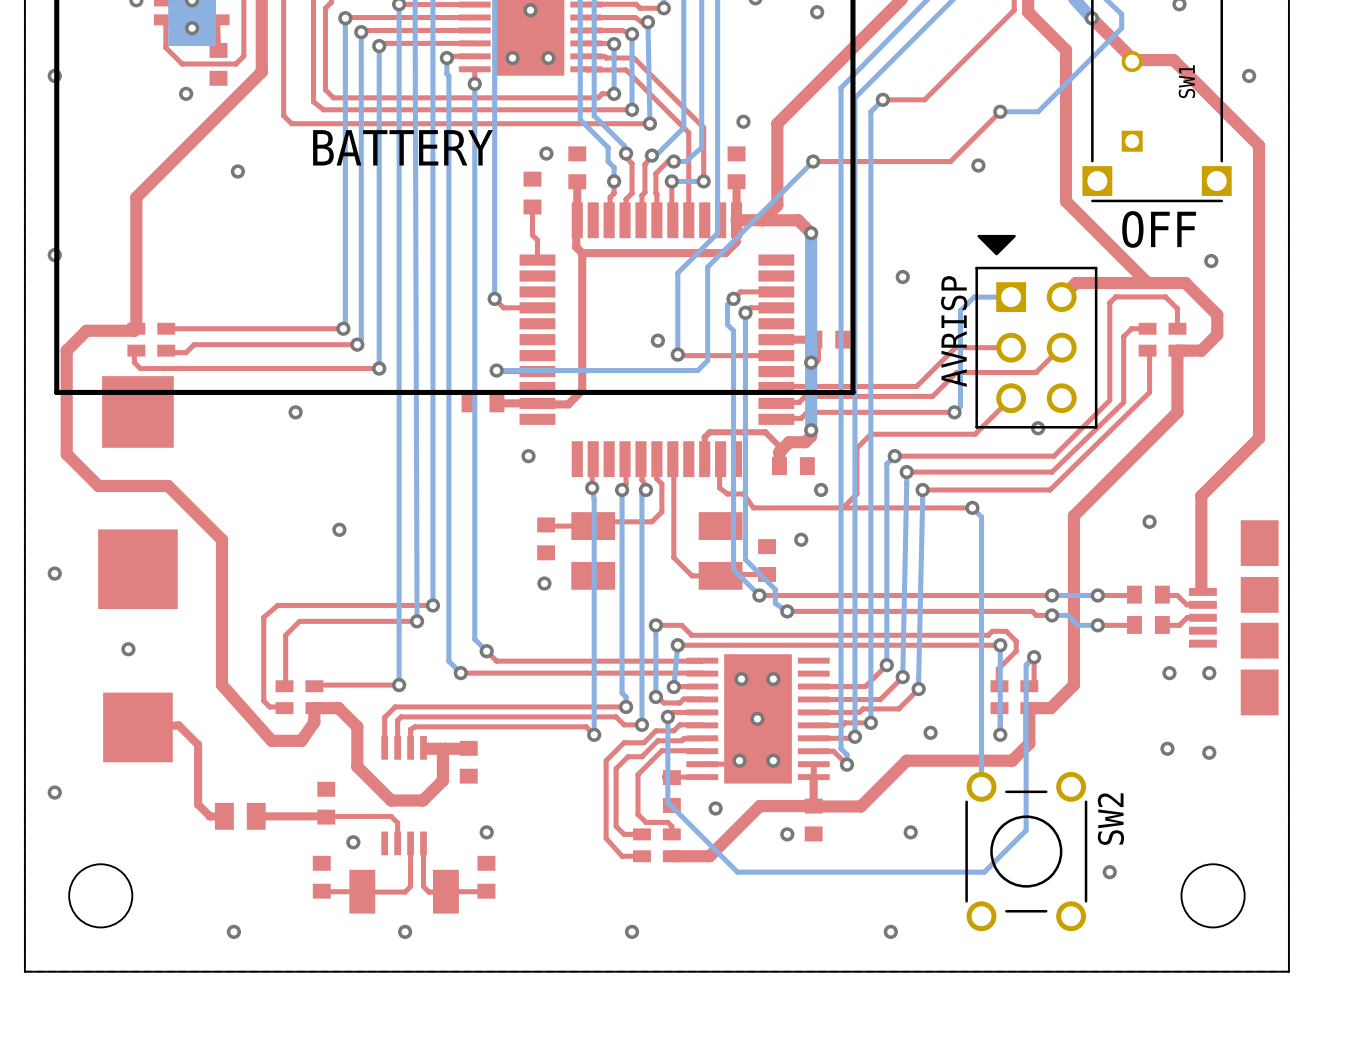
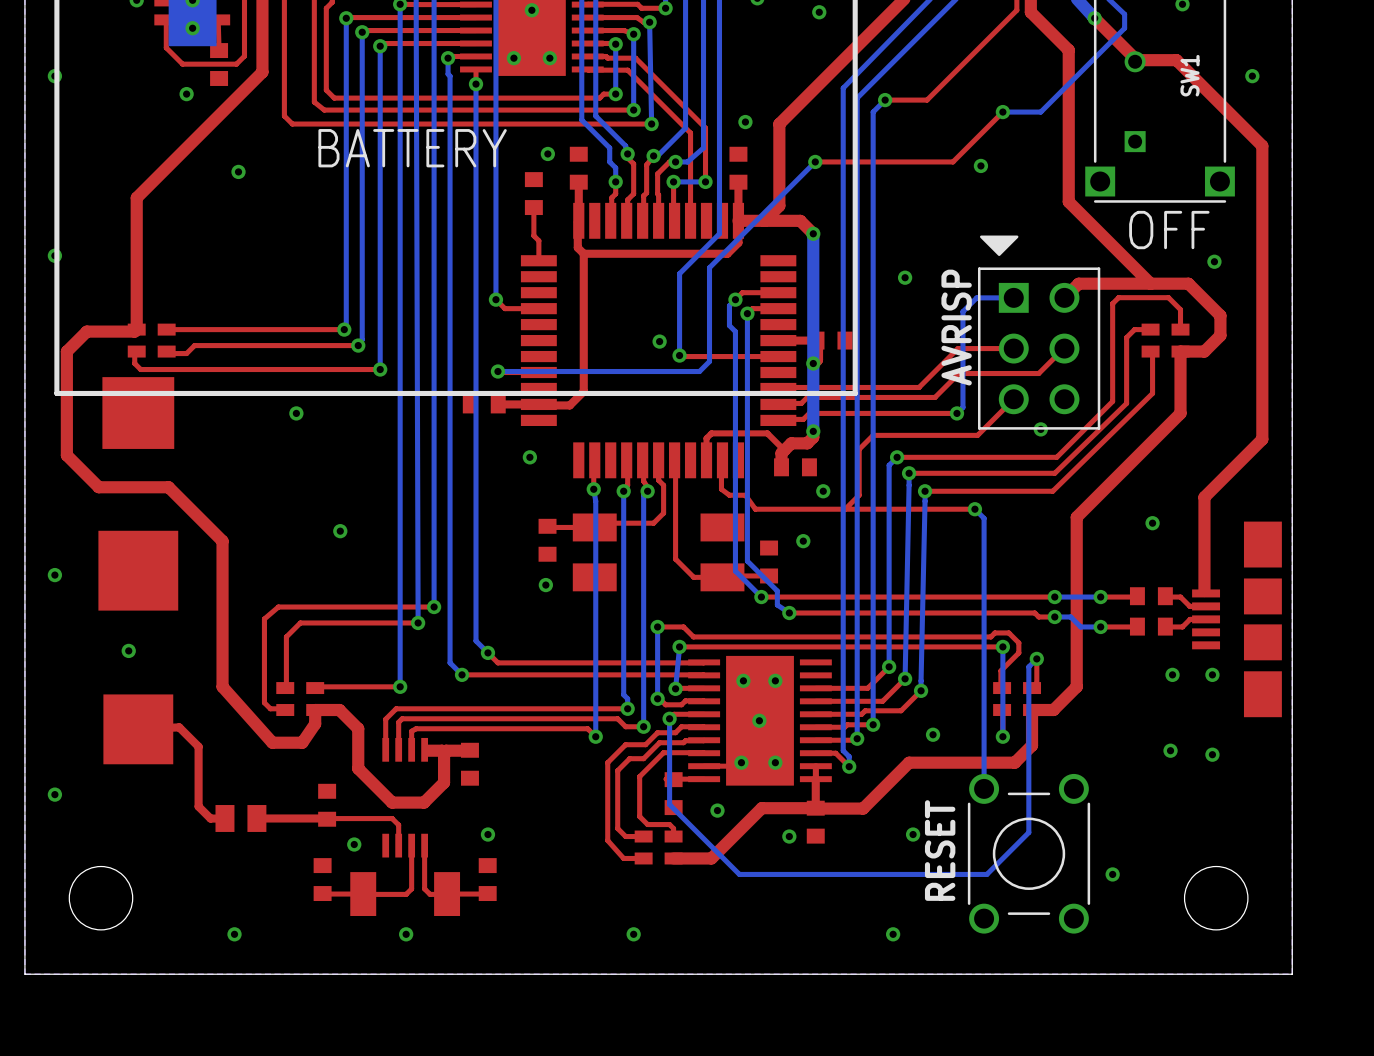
SW2 name: SW2 (1110, 819) -> RESET (940, 850)

